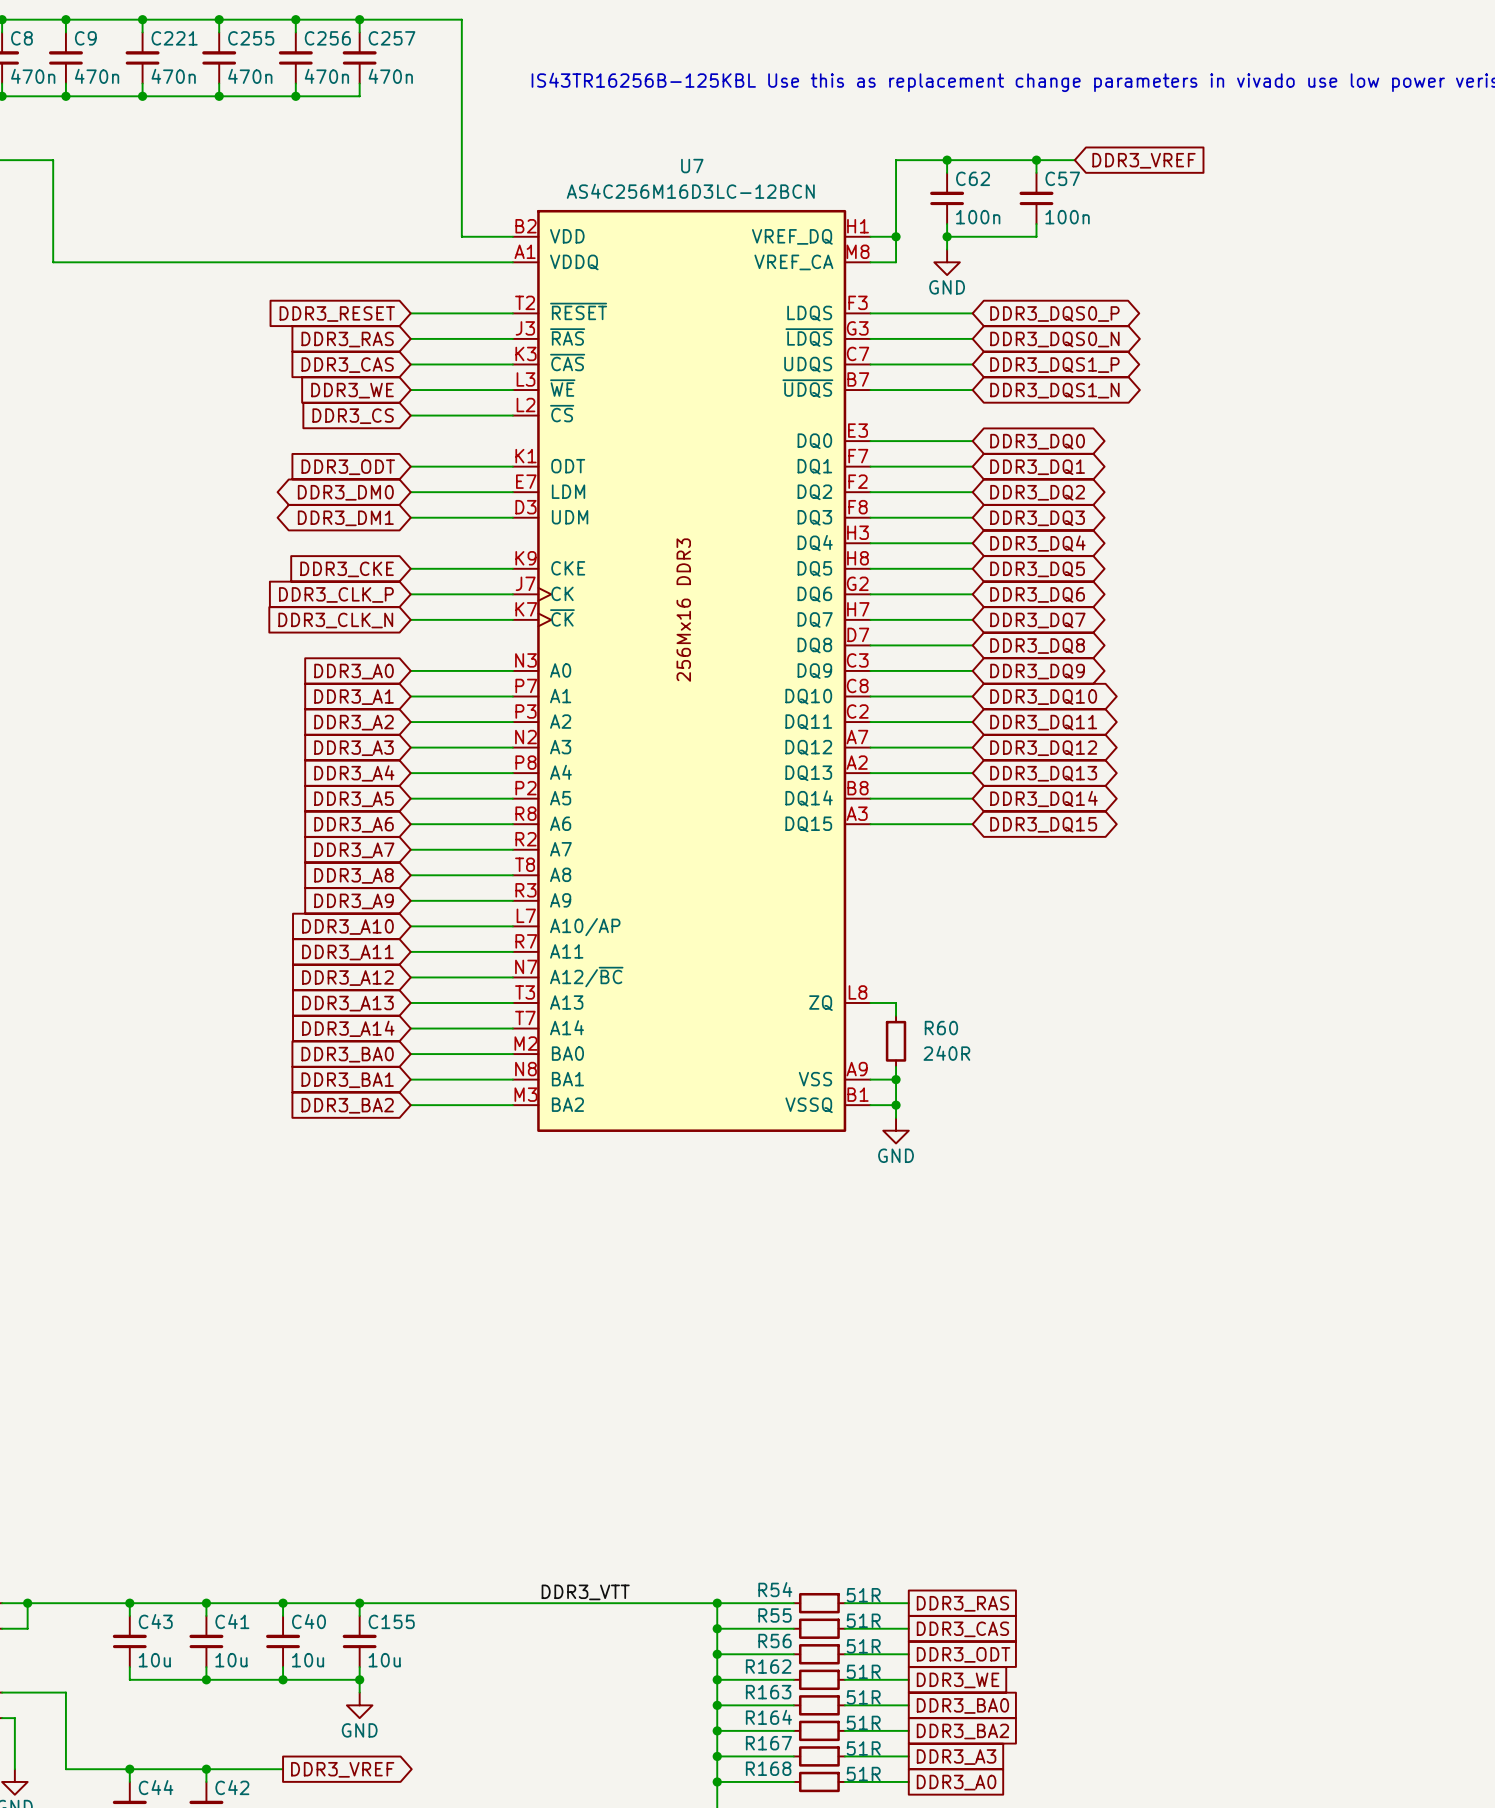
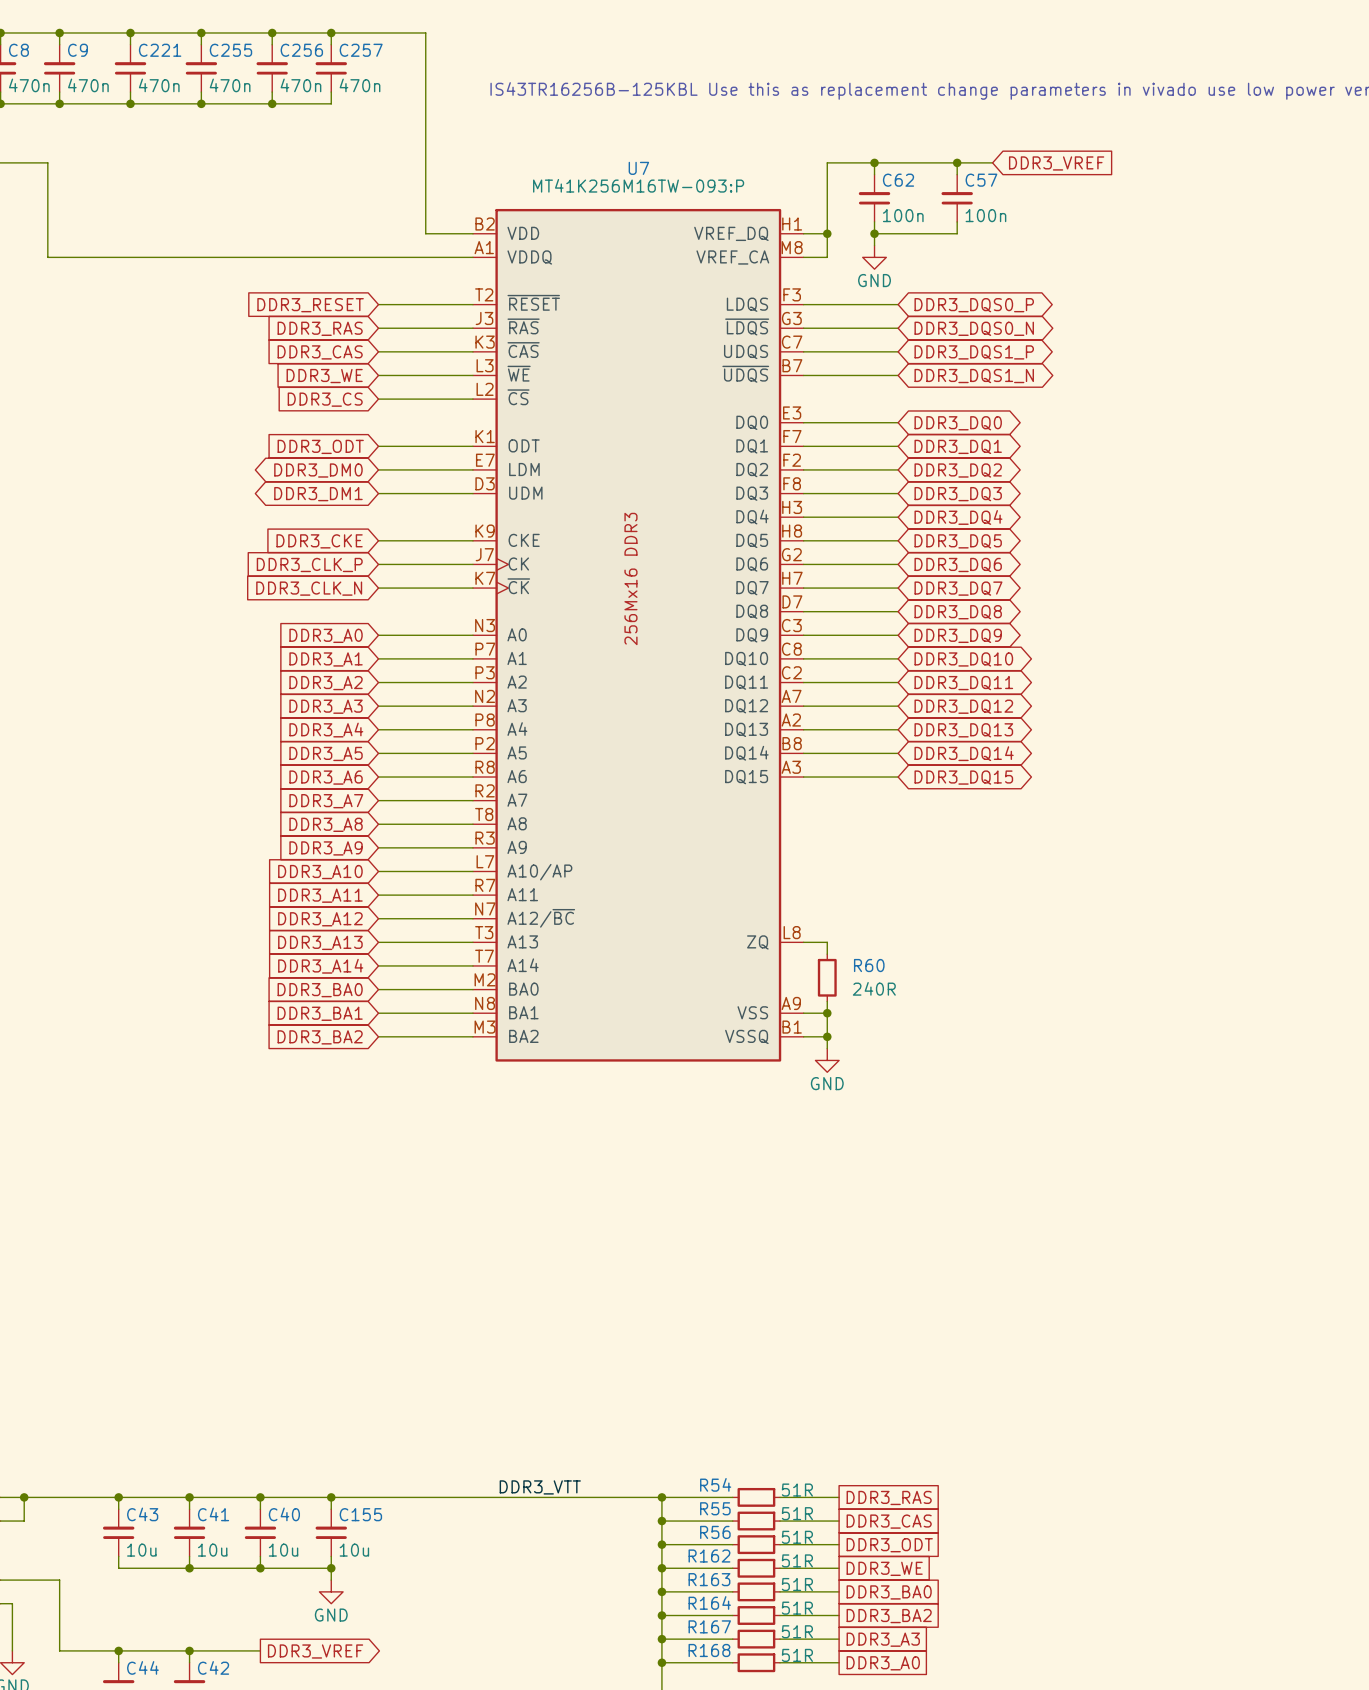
U7 text: AS4C256M16D3LC-12BCN (690, 191) -> MT41K256M16TW-093:P (638, 185)

